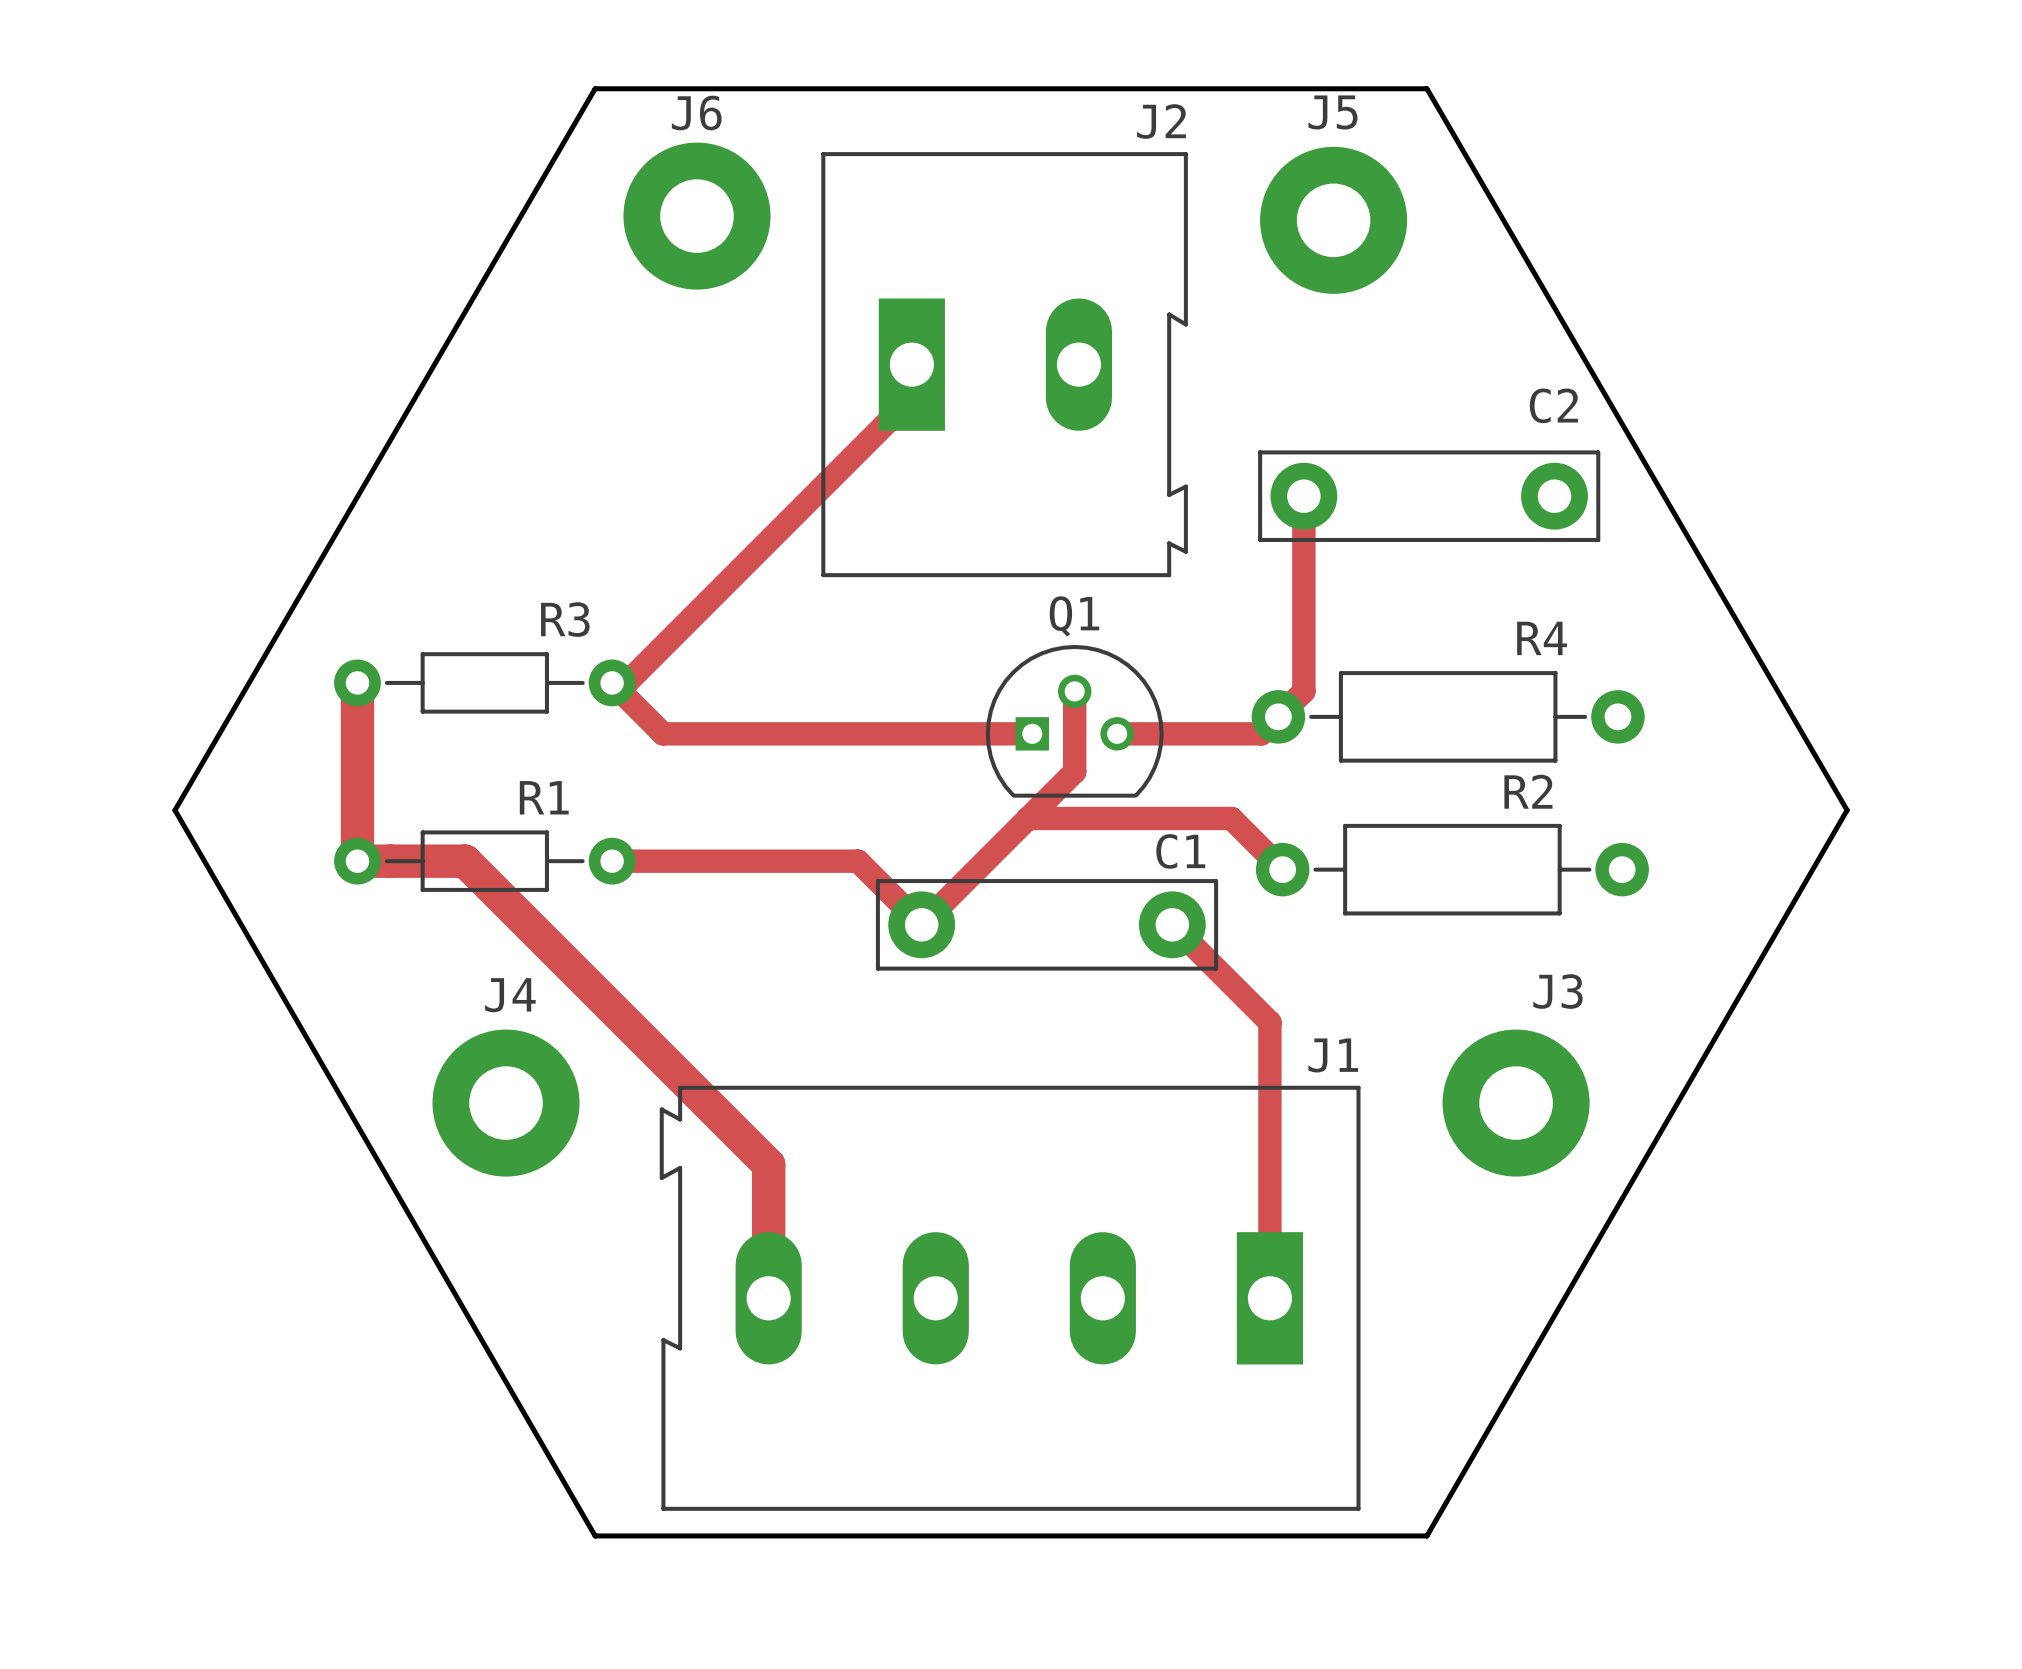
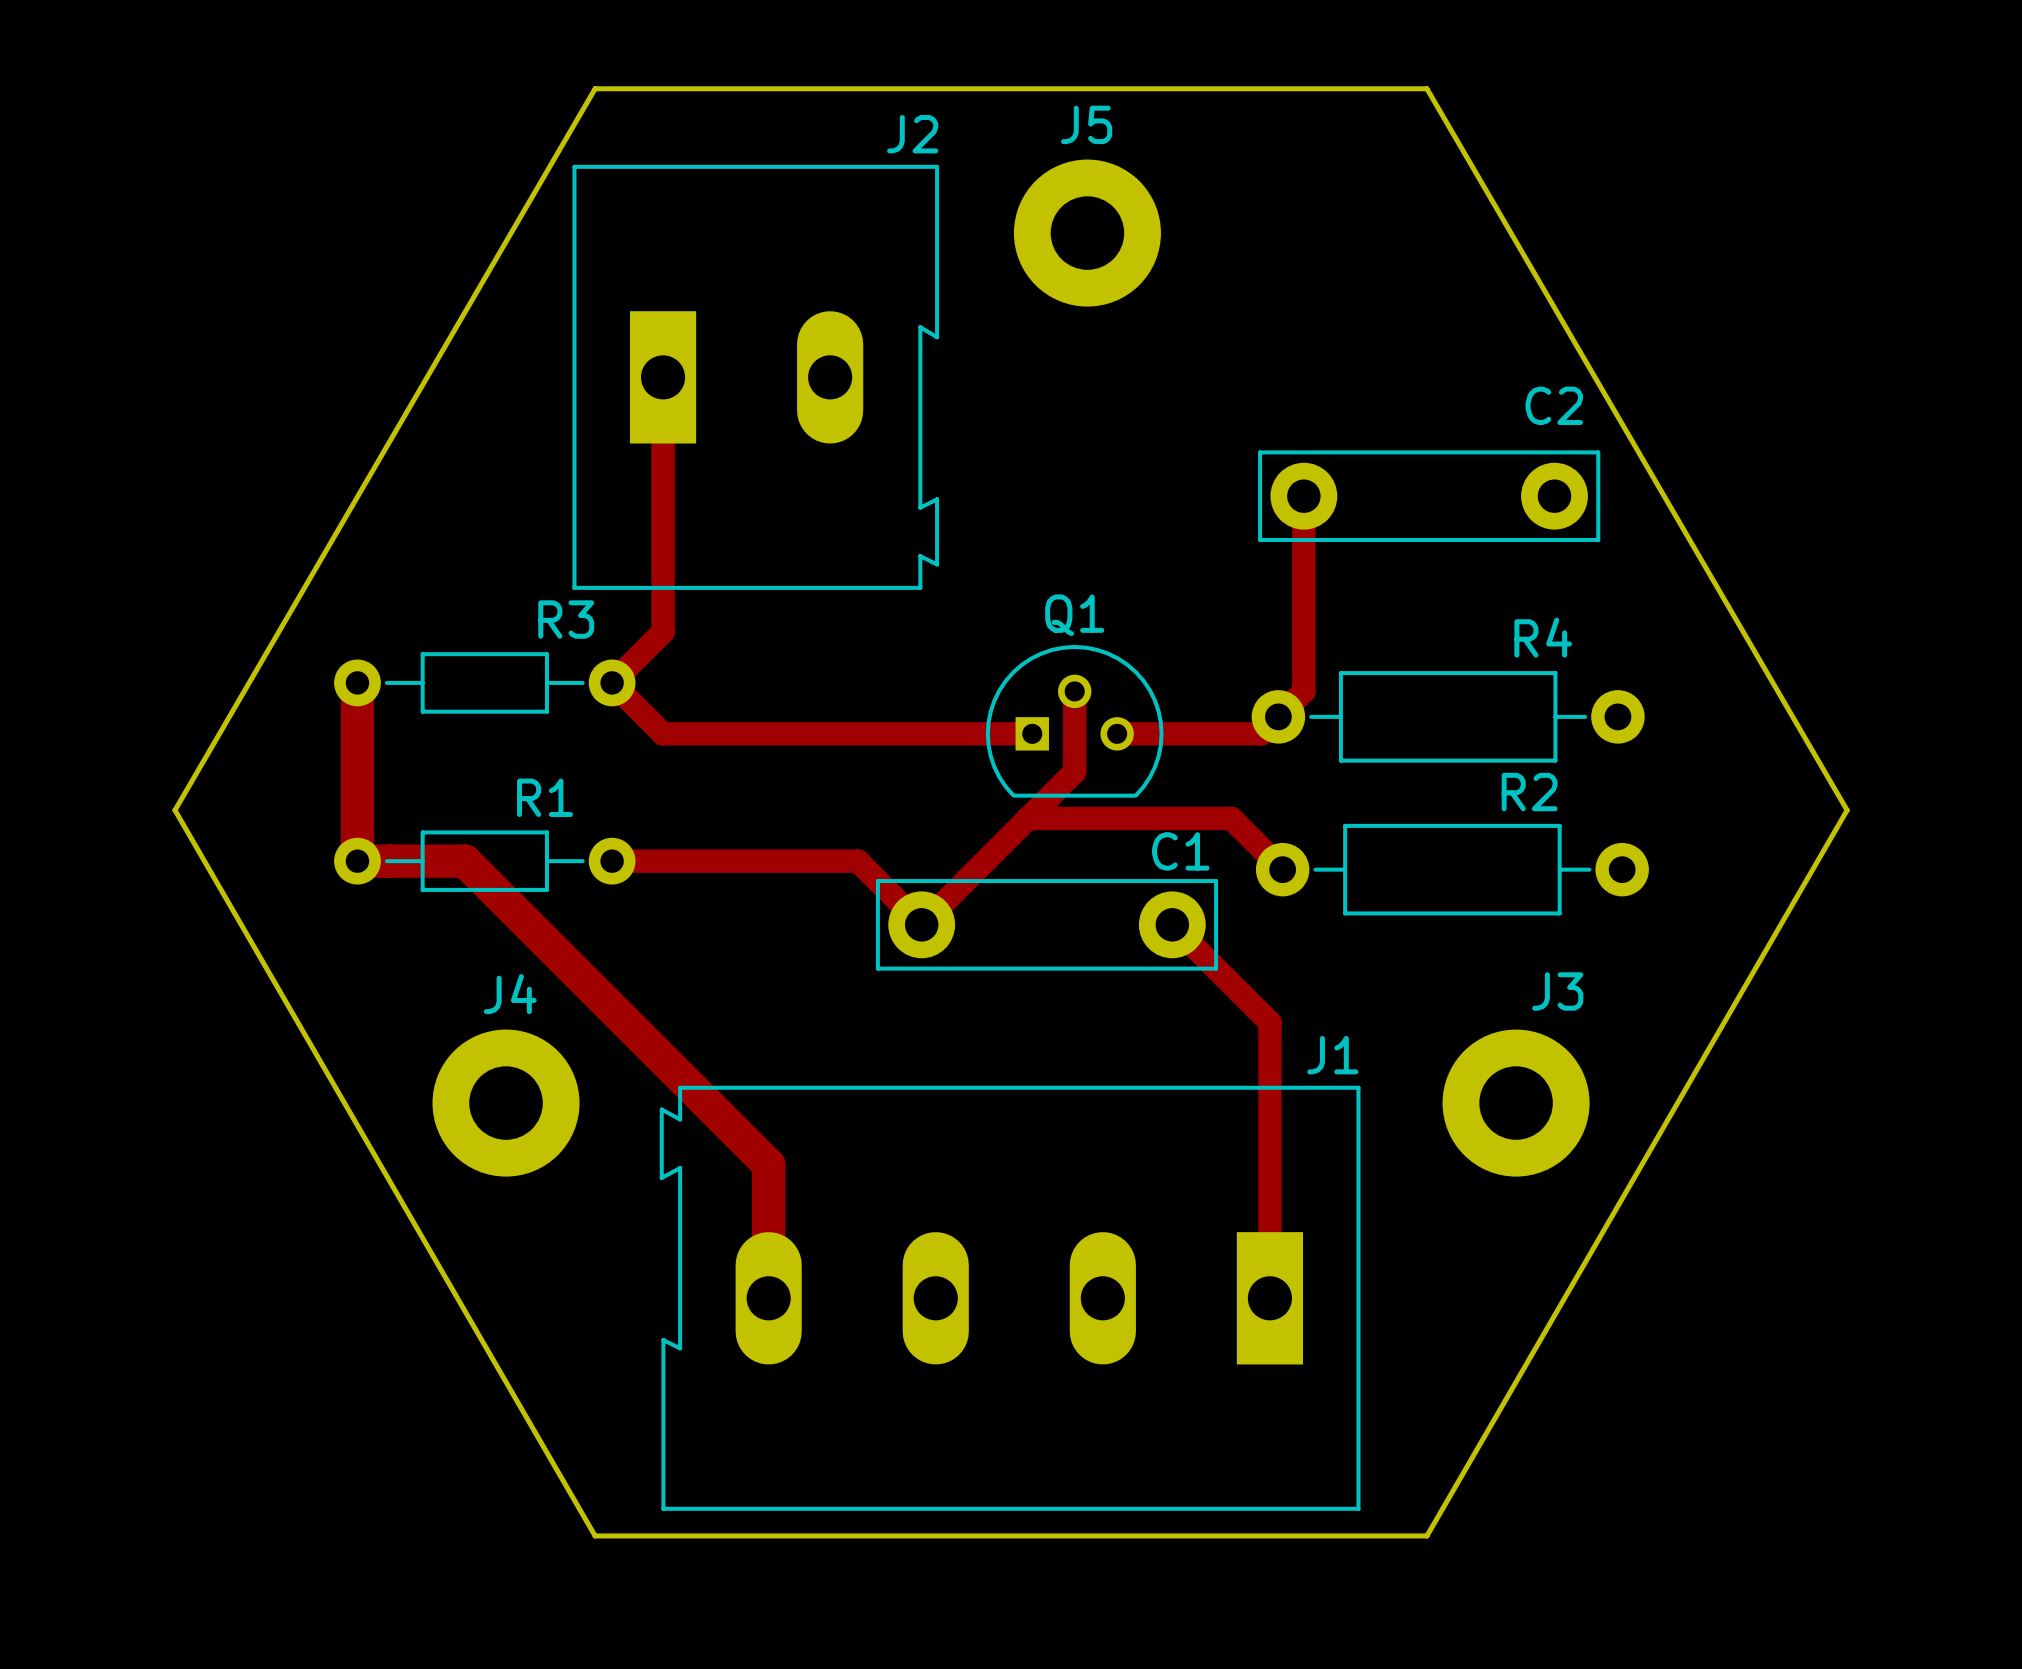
J6: (696, 216) -> none
J5 position: (1333, 220) -> (1087, 233)
top track: (911, 364) (911, 397) (626, 682) (612, 682) -> (663, 377) (663, 631) (612, 682)
J2 position: (1004, 364) -> (755, 377)

